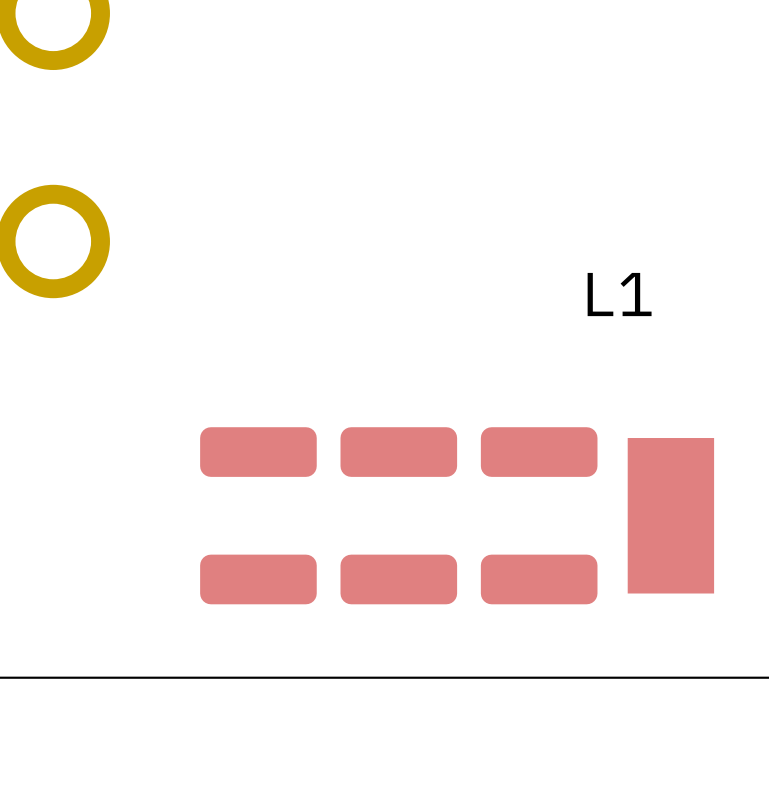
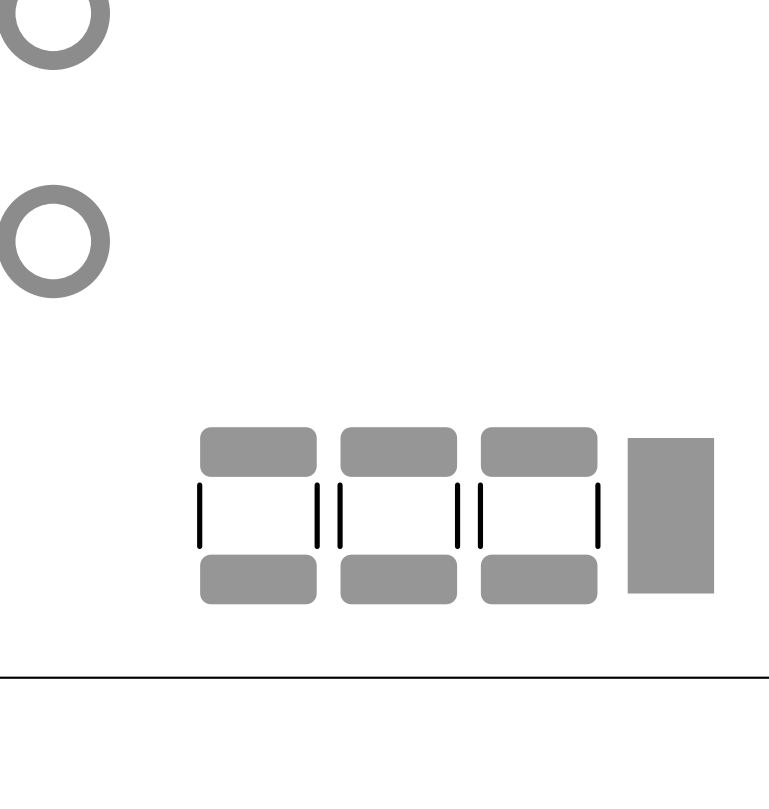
text: L1 (619, 294) -> none
part footprint: [200, 427, 317, 605] -> [197, 427, 320, 605]
part footprint: [340, 427, 458, 605] -> [337, 427, 461, 605]
part footprint: [480, 427, 598, 605] -> [477, 427, 601, 605]

